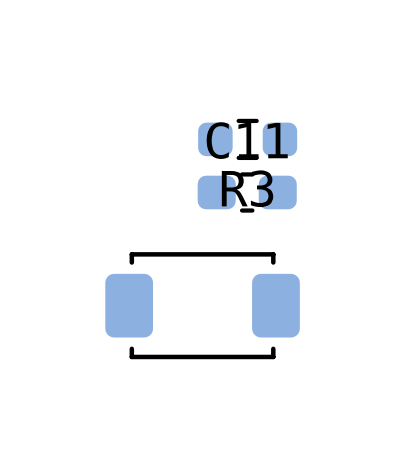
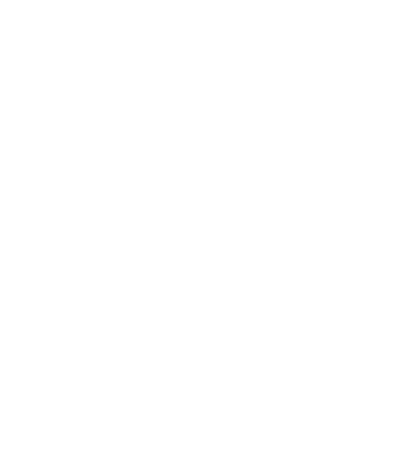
R3: (247, 139) -> none
C11: (247, 192) -> none
part: (202, 305) -> none

